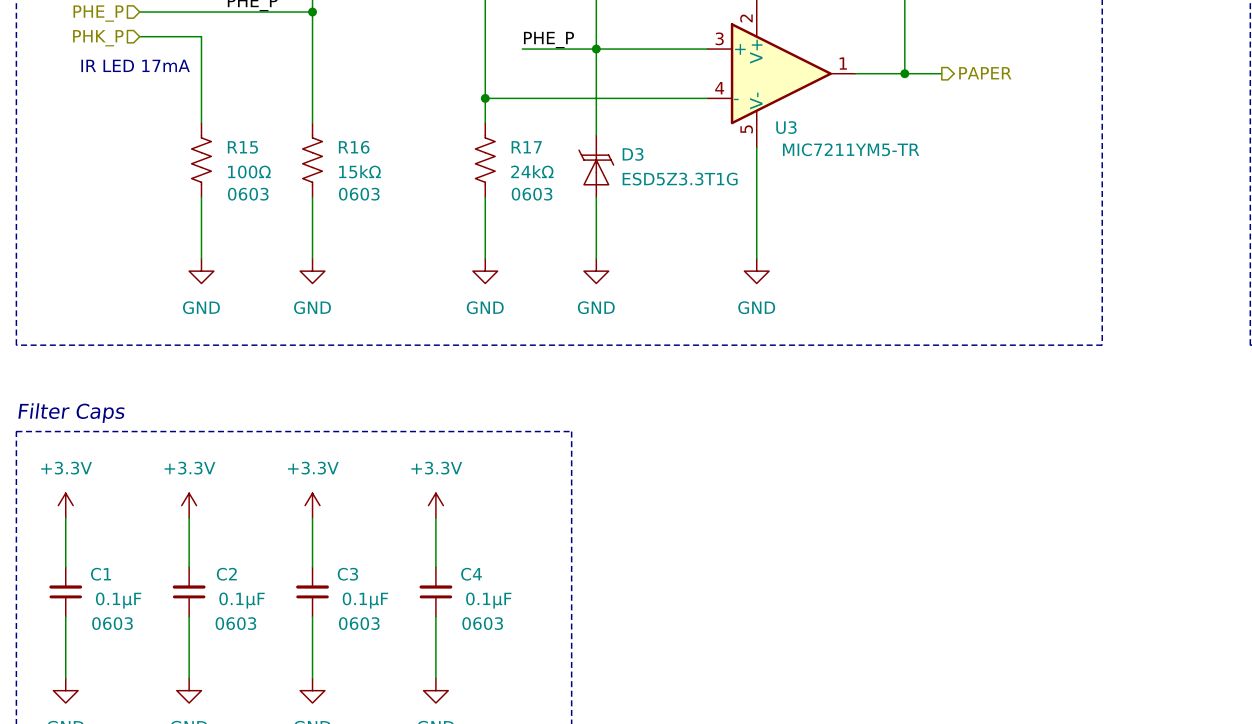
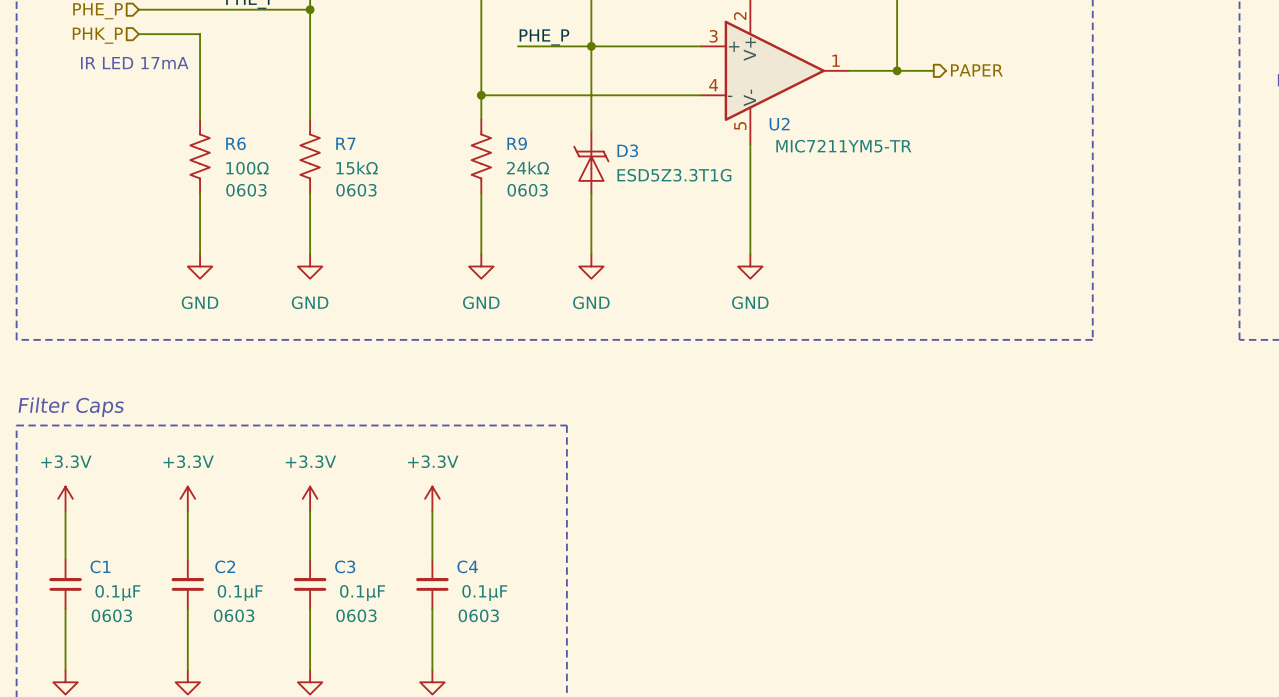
U3 name: U3 (786, 127) -> U2 (779, 124)
R15 name: R15 (242, 147) -> R6 (235, 143)
R16 name: R16 (354, 147) -> R7 (345, 143)
R17 name: R17 (526, 147) -> R9 (517, 143)

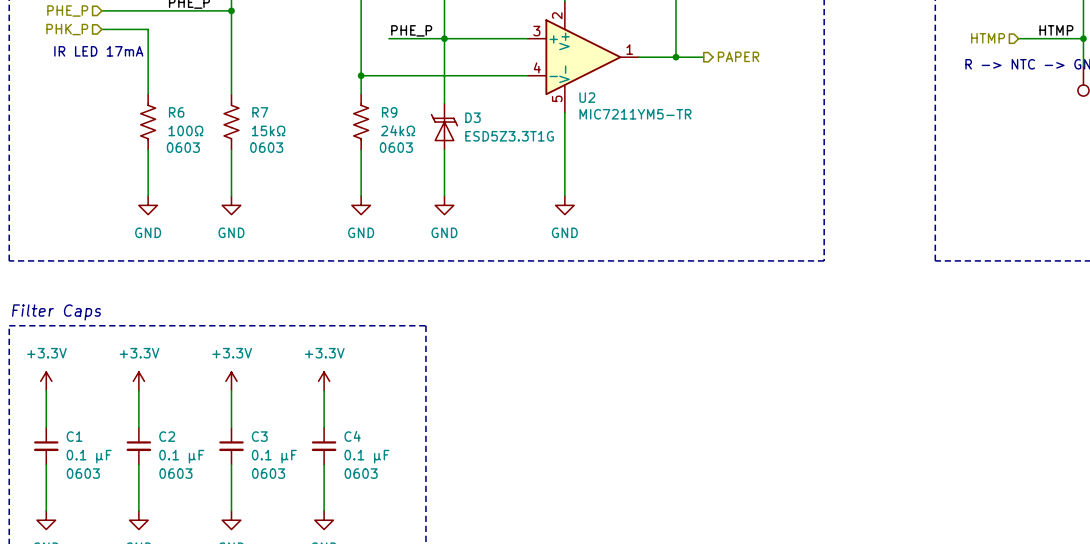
C1 rotation: 0° (65, 584) -> 180° (46, 446)
C2 rotation: 0° (187, 584) -> 180° (138, 446)
C3 rotation: 0° (310, 584) -> 180° (231, 446)
C4 rotation: 0° (432, 584) -> 180° (324, 446)
C1 value: 0.1µF (117, 592) -> 0.1 µF (89, 456)
C2 value: 0.1µF (240, 592) -> 0.1 µF (181, 456)
C3 value: 0.1µF (362, 592) -> 0.1 µF (274, 456)
C4 value: 0.1µF (484, 592) -> 0.1 µF (366, 456)

